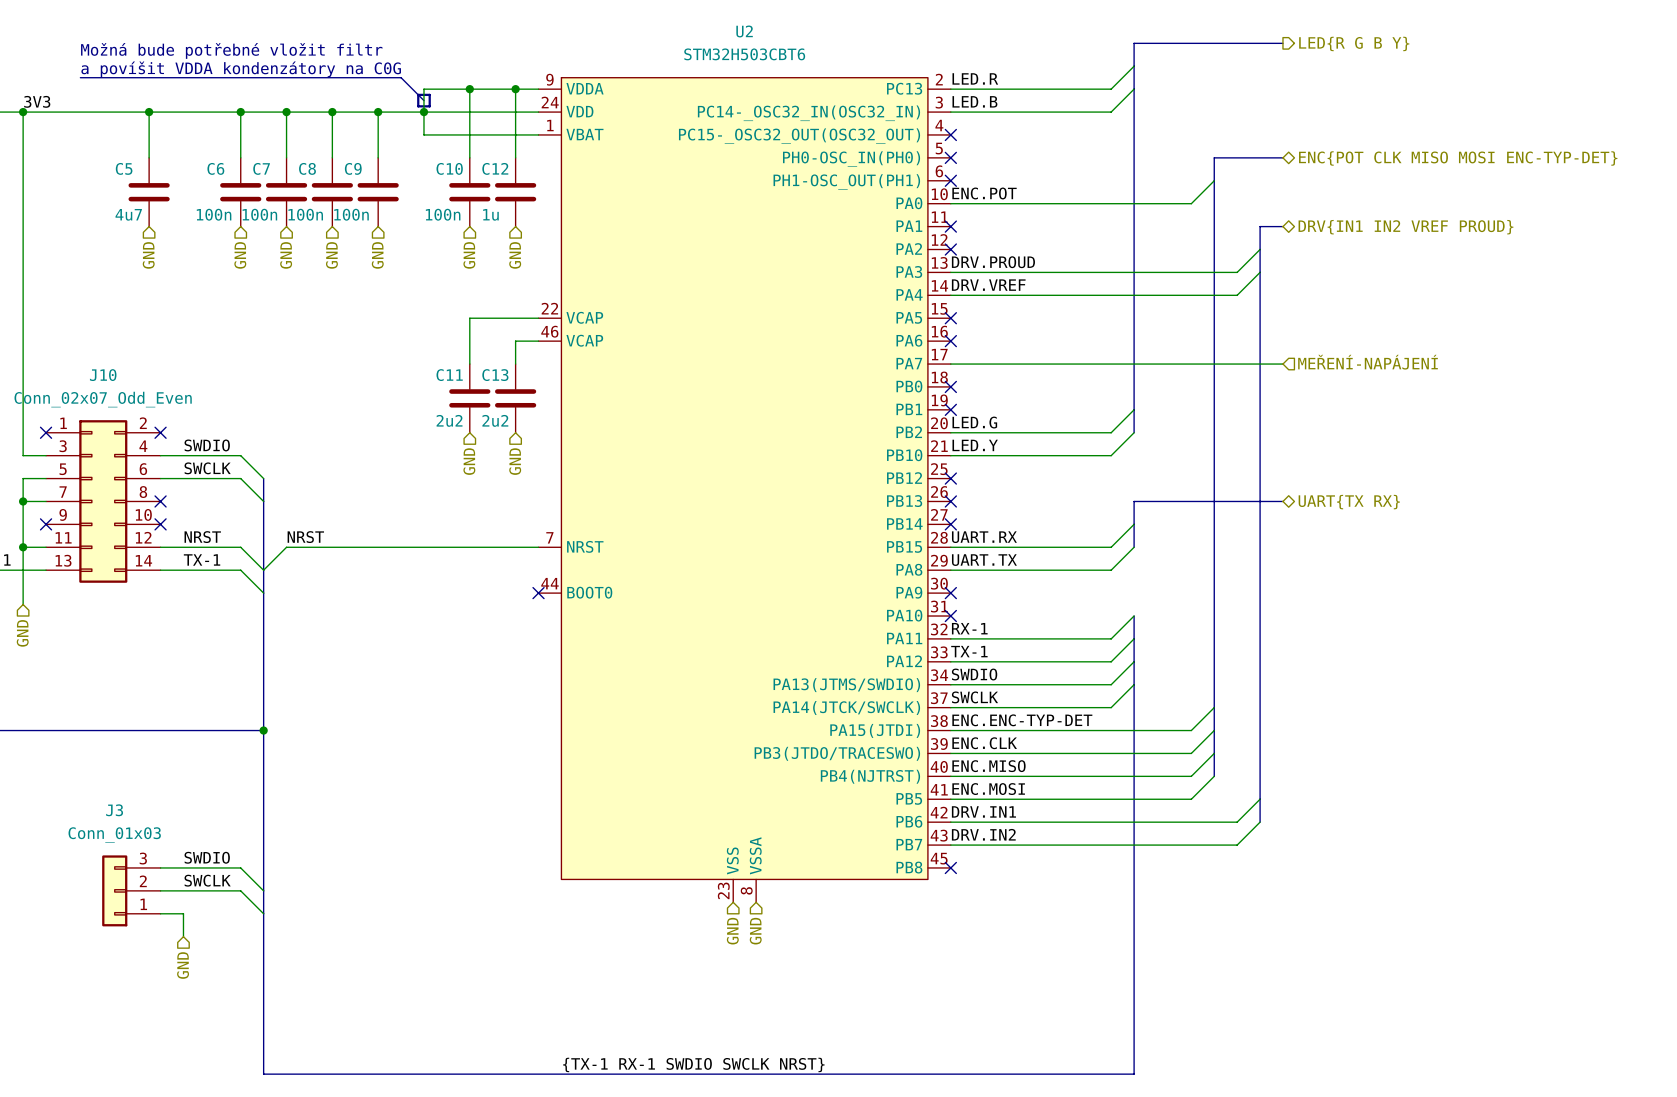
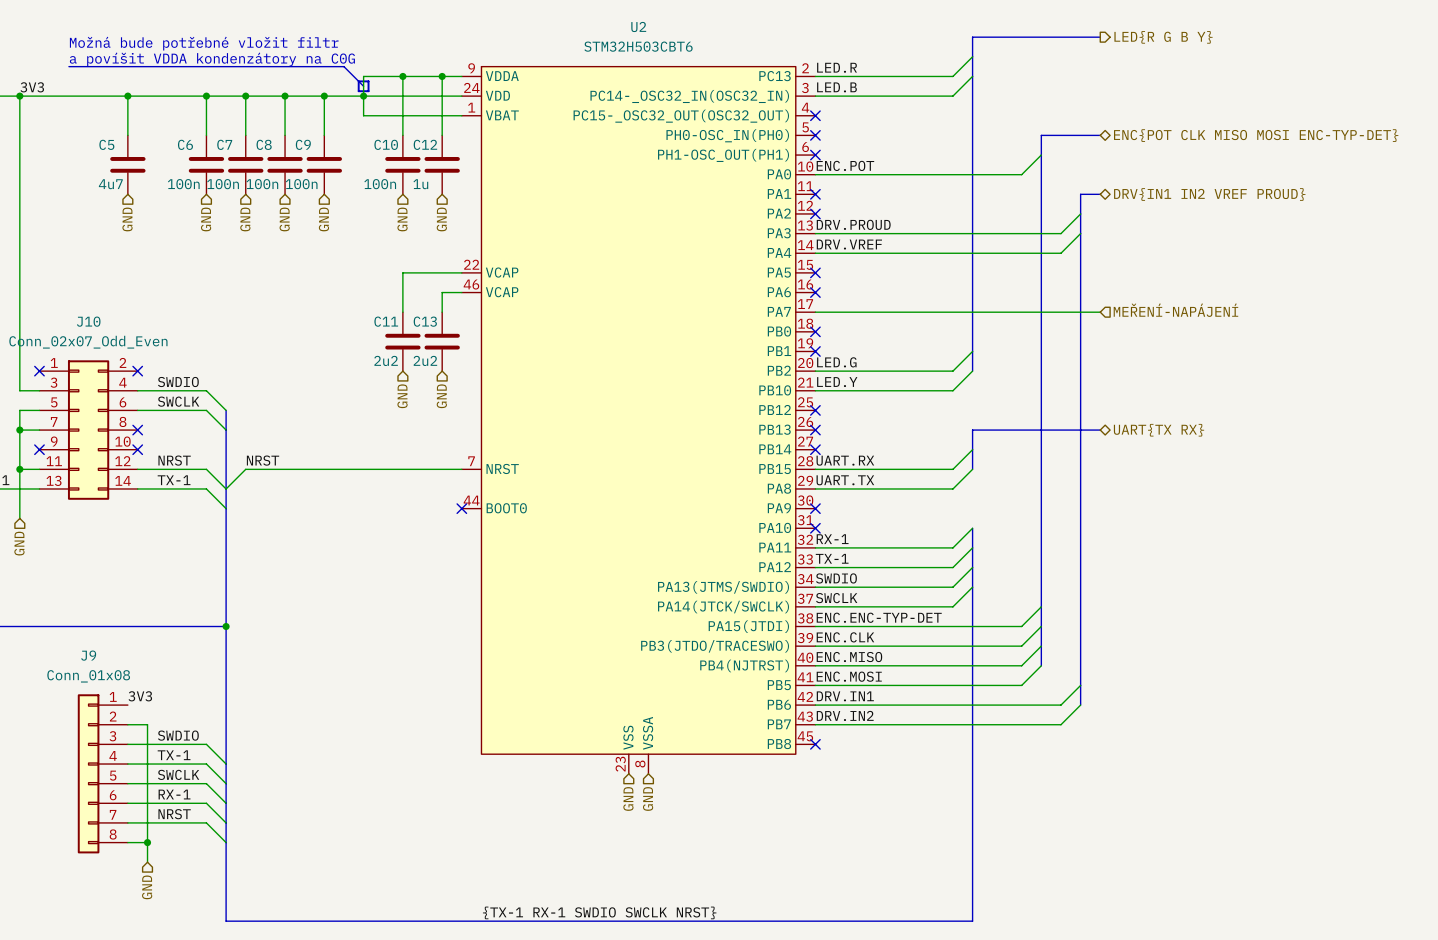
label: none -> 3V3 (140, 696)
wire: none -> (127, 724) (147, 724) (147, 862)
label: SWCLK (207, 880) -> TX-1 (174, 755)
J3: Conn_01x03 (131, 890) -> none
J9: none -> Conn_01x08 (102, 773)
label: none -> SWCLK (178, 774)
wire: (183, 913) (183, 936) -> (157, 783) (206, 783) (226, 803)
label: none -> RX-1 (174, 794)
wire: none -> (127, 803) (206, 803) (226, 822)
label: none -> NRST (174, 814)
wire: none -> (127, 822) (206, 822) (226, 842)
hierarchical label position: GND (183, 965) -> GND (147, 887)
wire: none -> (127, 842) (147, 842)
junction: none -> (147, 842)

